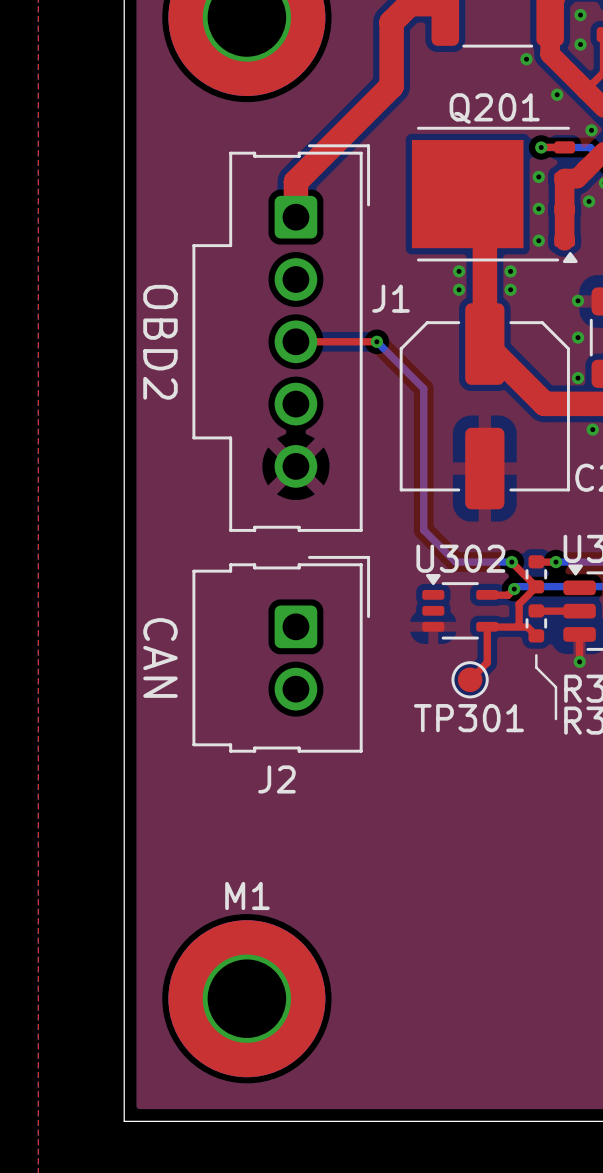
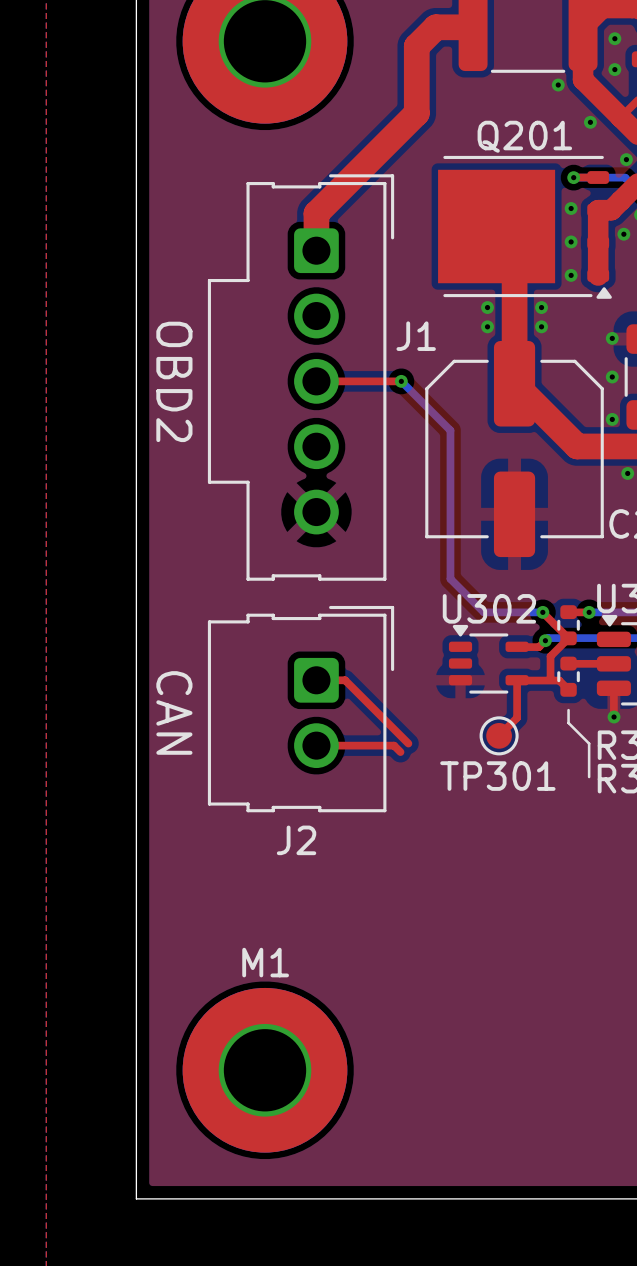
top track: none -> (316, 680) (345, 680) (408, 743)
top track: none -> (316, 745) (394, 745) (400, 752)

